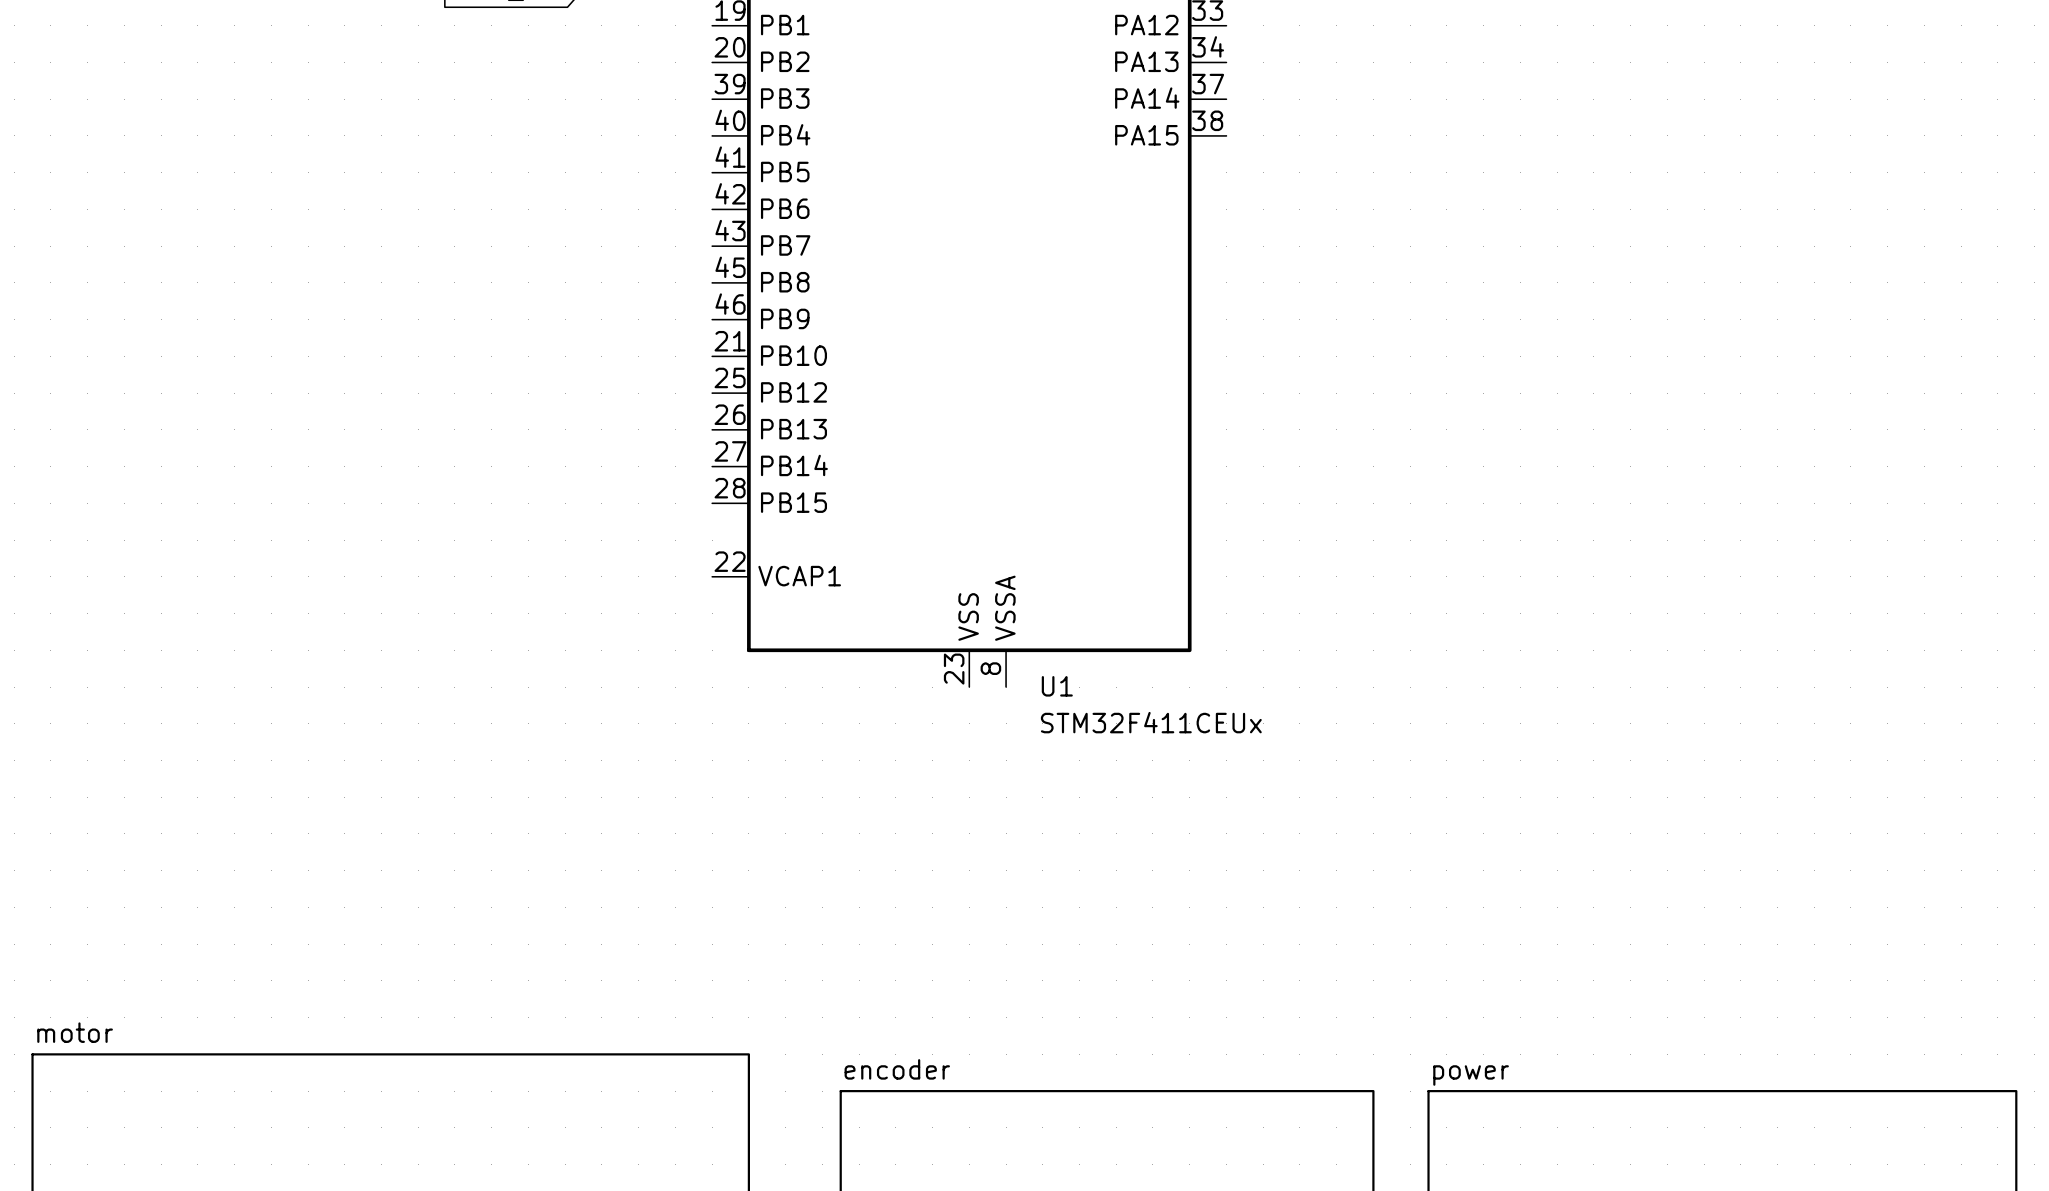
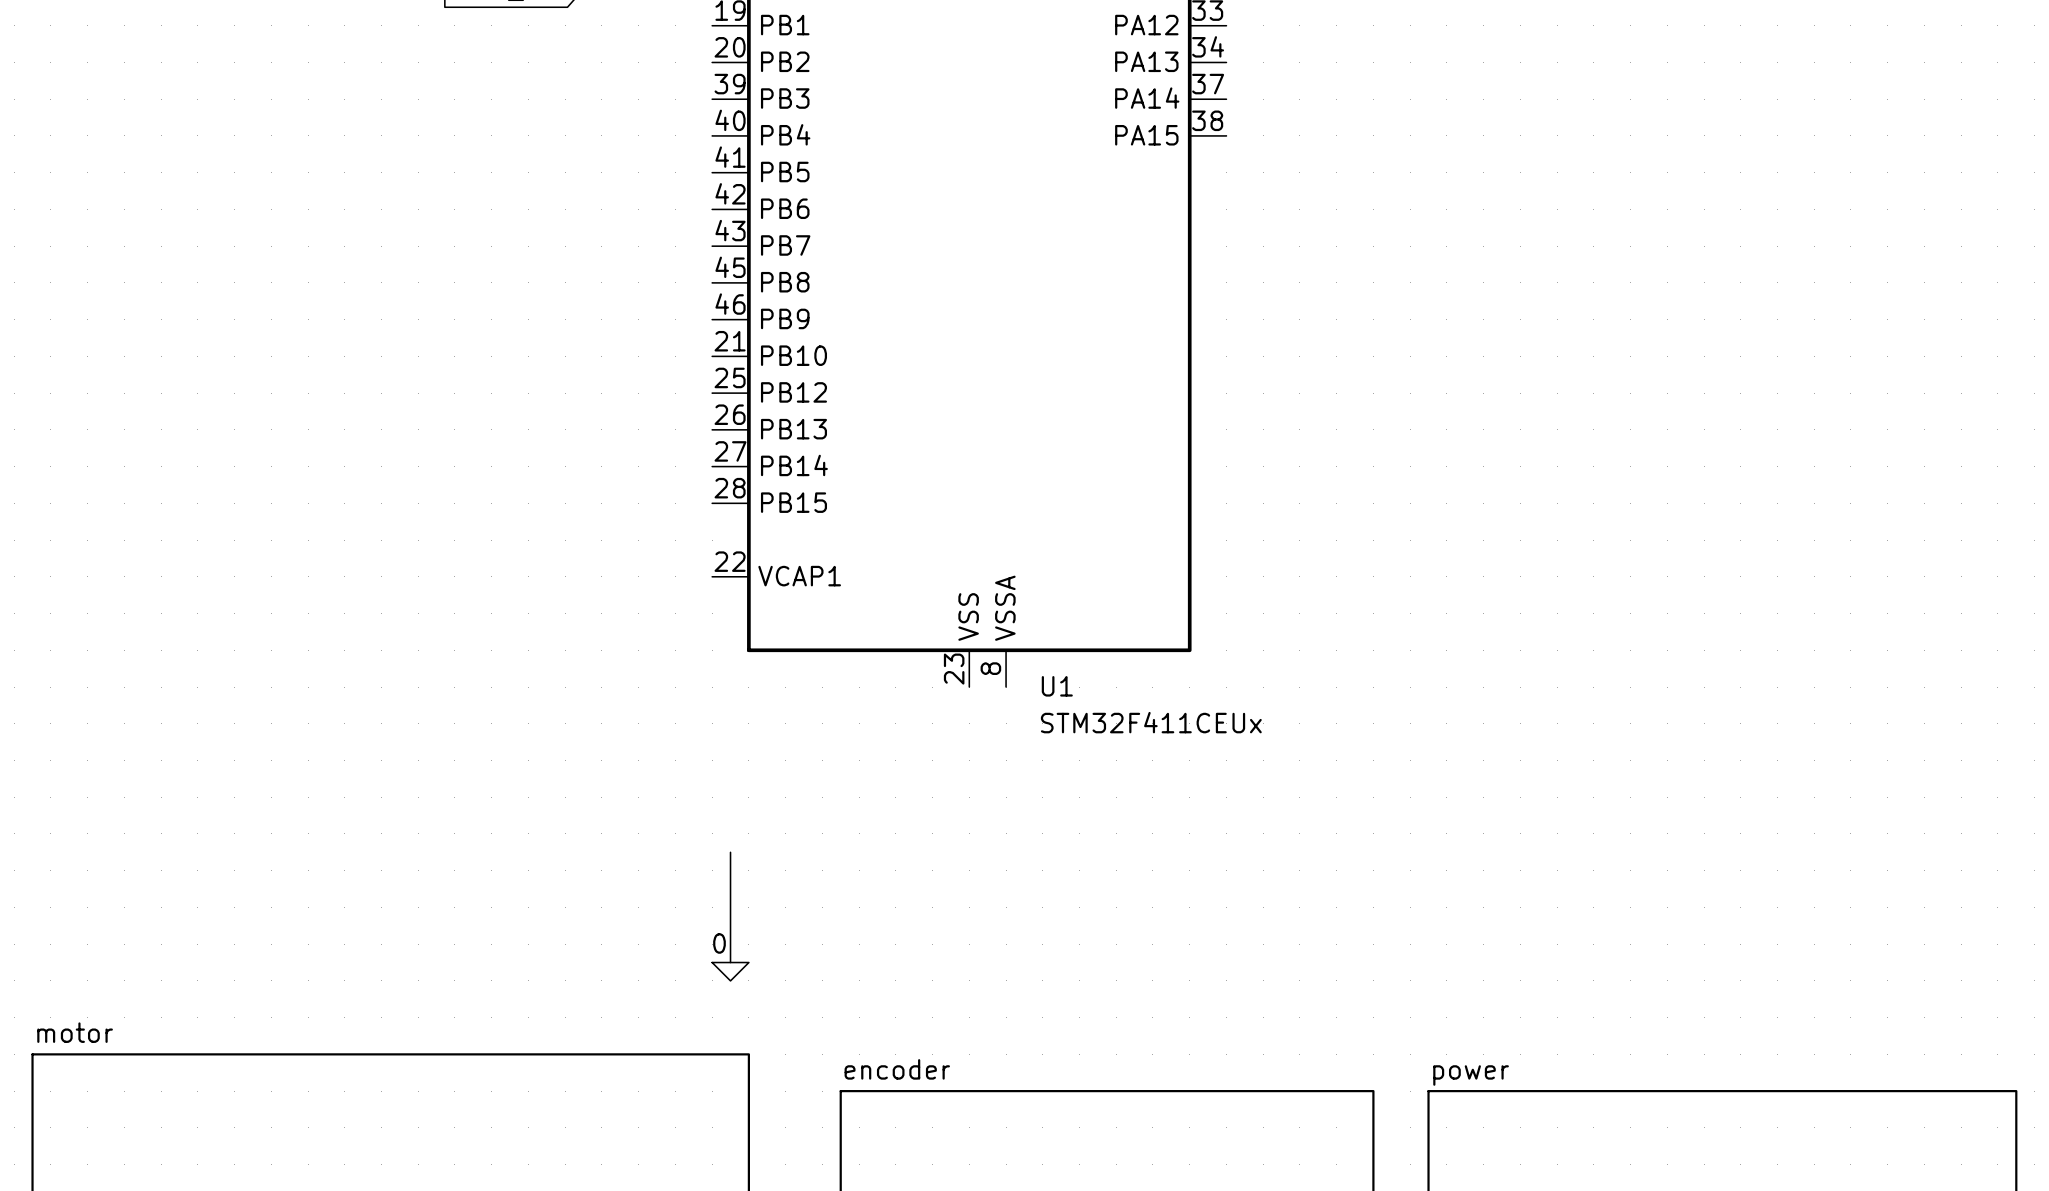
wire: none -> (730, 852) (730, 962)
power symbol: none -> 0 (730, 971)

